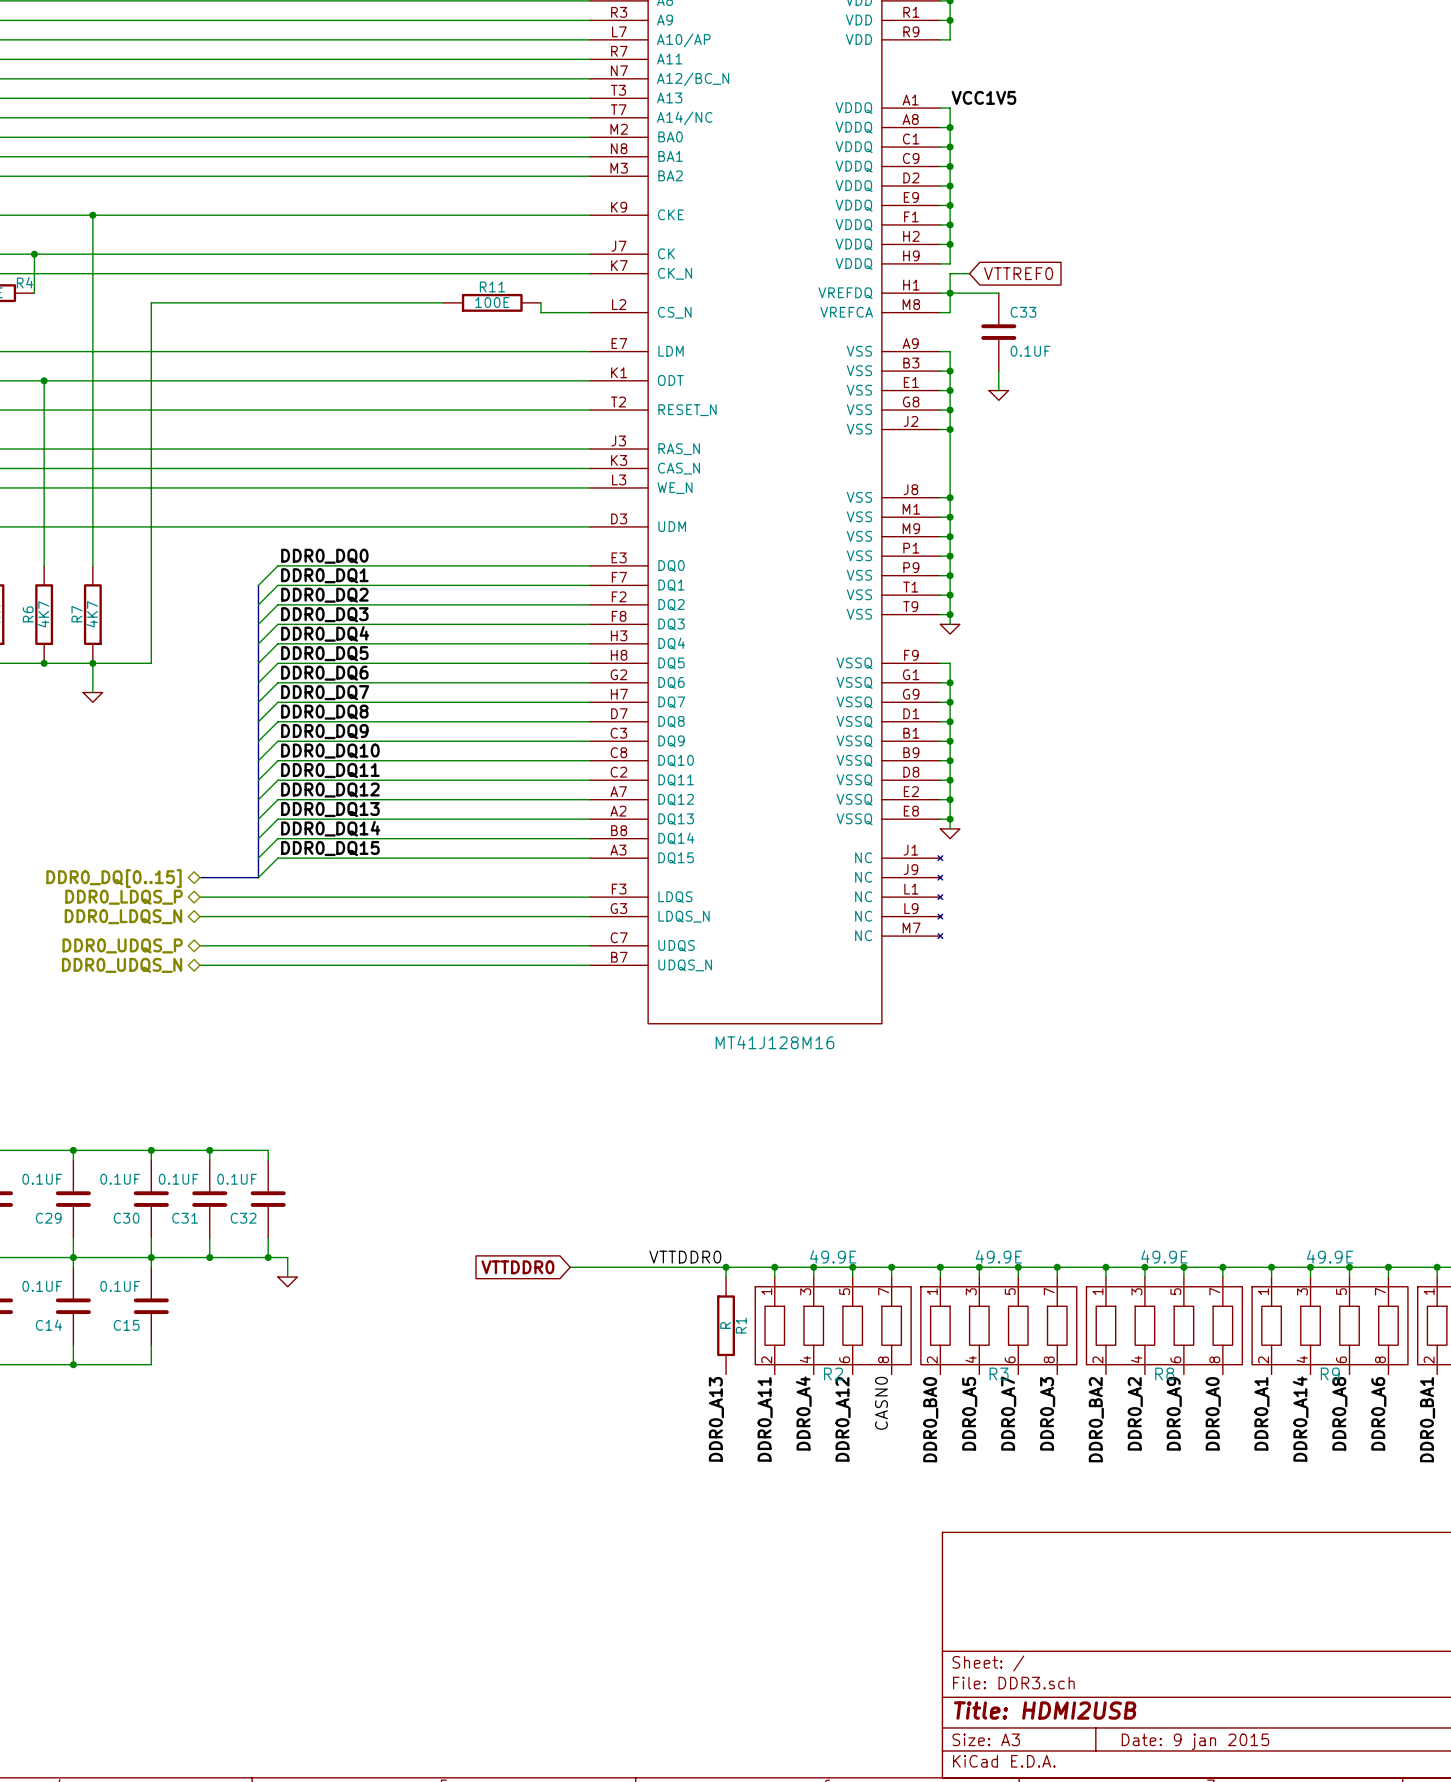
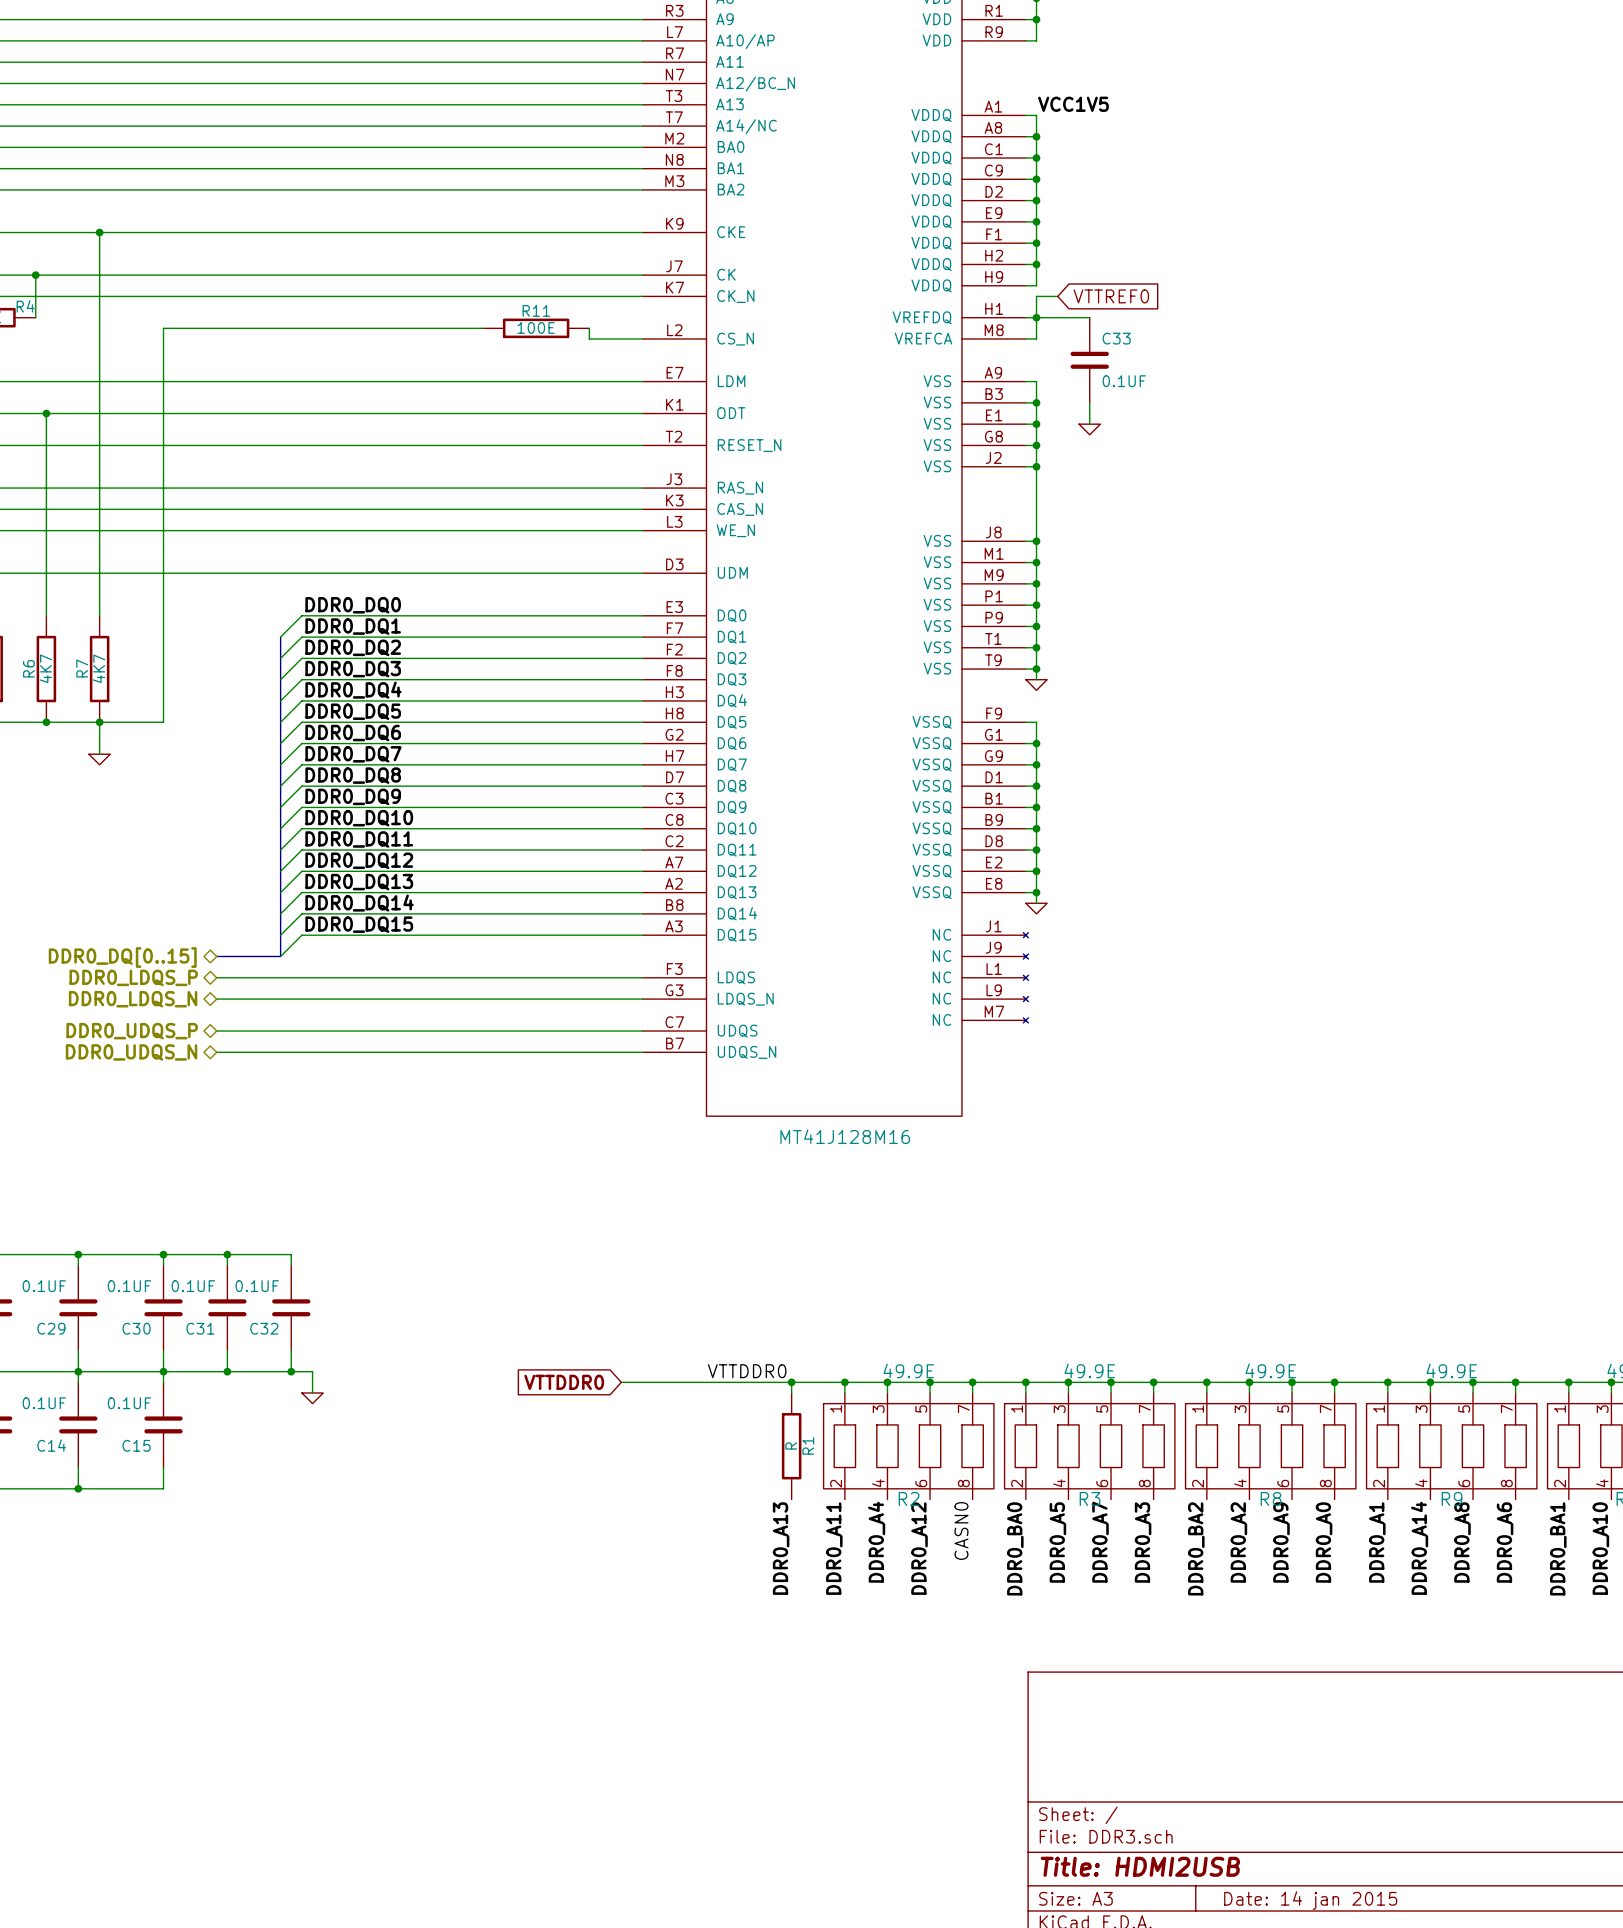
title block: Date: 9 jan 2015 (1195, 1741) -> Date: 14 jan 2015 (1310, 1900)

